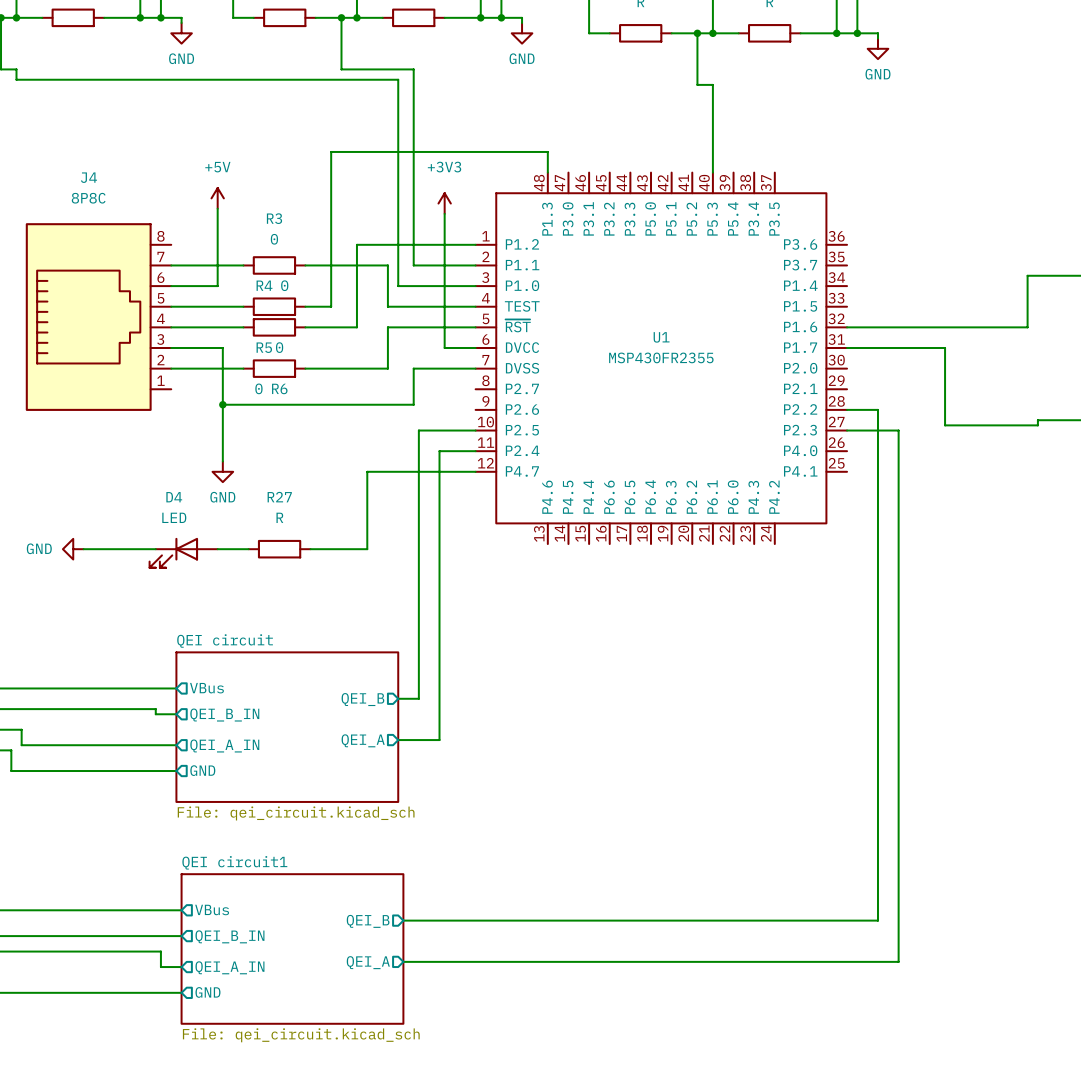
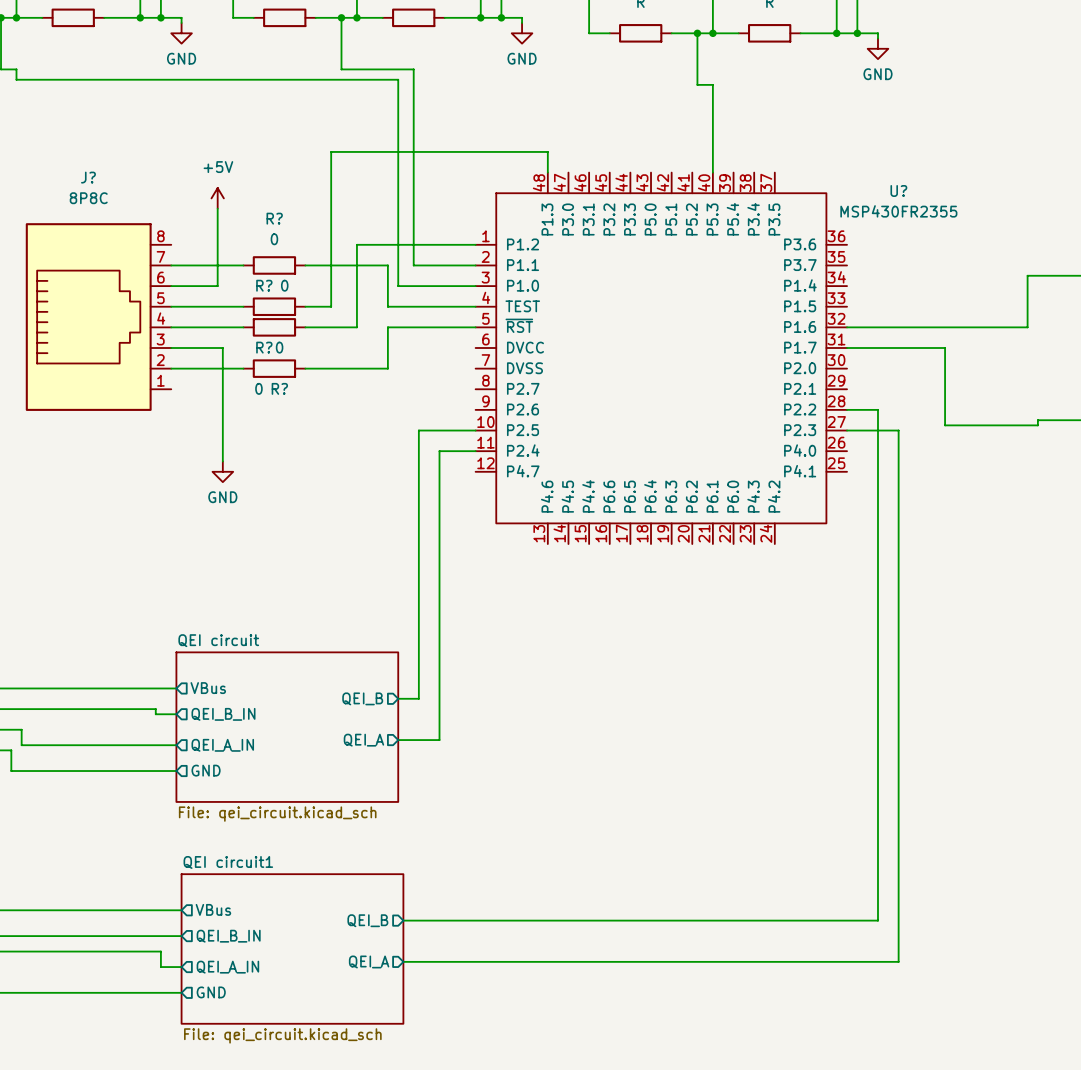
J4 name: J4 (88, 177) -> J? (88, 177)
power symbol: +3V3 (444, 203) -> none
wire: (444, 213) (444, 347) (475, 347) -> none
R3 name: R3 (274, 218) -> R? (274, 218)
R4 name: R4 (264, 285) -> R? (264, 285)
U1 name: U1 (661, 337) -> U? (898, 190)
R5 name: R5 (264, 347) -> R? (264, 347)
U1 value position: MSP430FR2355 (661, 357) -> MSP430FR2355 (898, 211)
wire: (475, 368) (413, 368) (413, 404) (222, 404) -> none
R6 name: R6 (279, 388) -> R? (279, 388)
junction: (222, 404) -> none
wire: (475, 471) (367, 471) (367, 549) (310, 549) -> none
power symbol: GND (73, 549) -> none
wire: (83, 549) (155, 549) -> none
wire: (217, 549) (248, 549) -> none
R27: R (279, 549) -> none
D4: LED (183, 552) -> none

